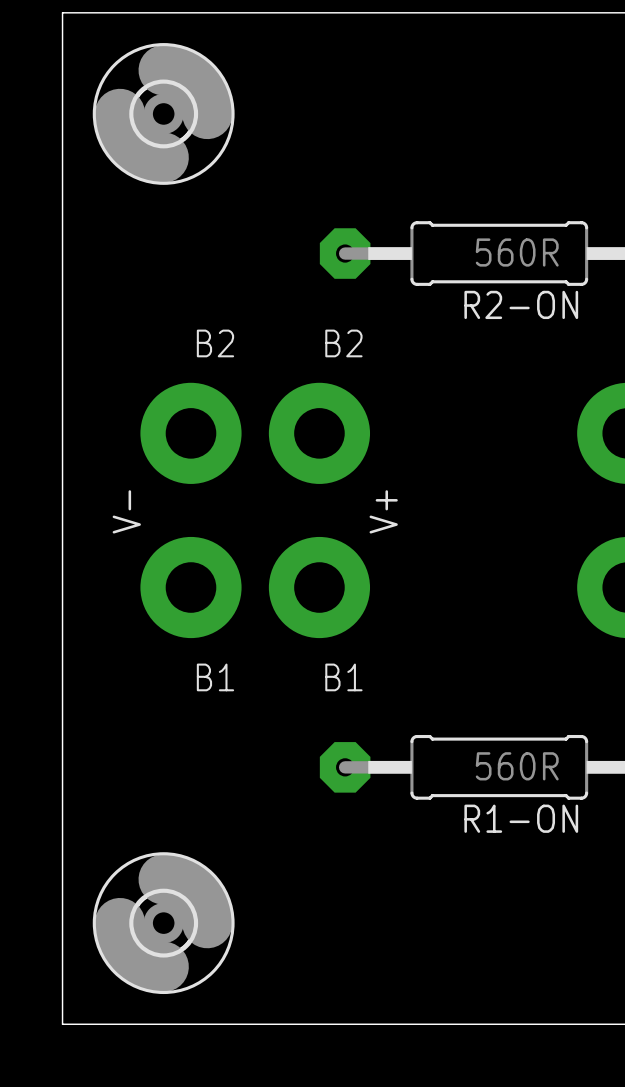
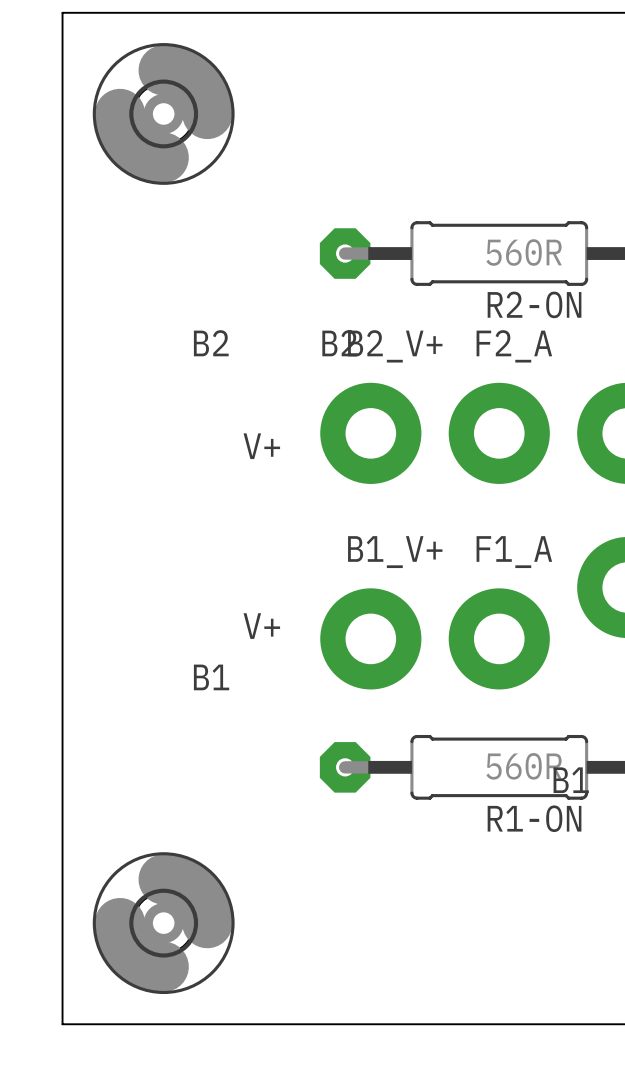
B2_V+: none -> (370, 433)
F2_A: none -> (499, 433)
text: none -> V+ (261, 446)
V-: (190, 510) -> none
V+: (319, 510) -> none
text: none -> V+ (261, 626)
B1_V+: none -> (370, 638)
F1_A: none -> (499, 638)
text position: B1 (343, 677) -> B1 (571, 780)

